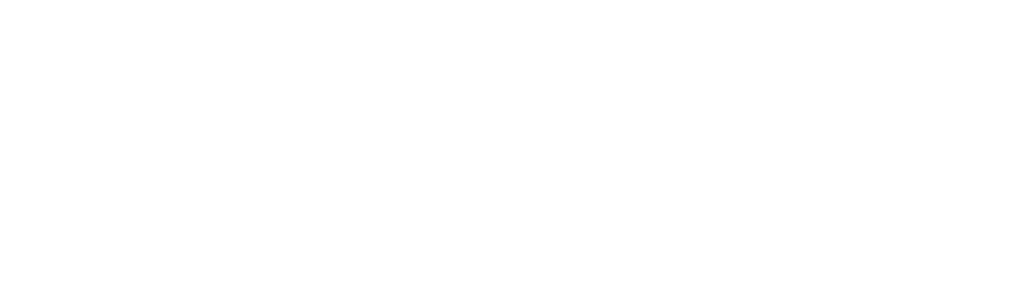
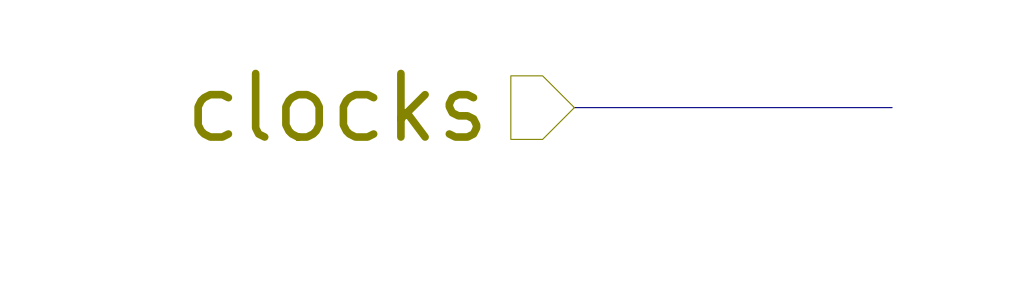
hierarchical label: none -> clocks (337, 105)
bus: none -> (574, 107) (892, 107)

